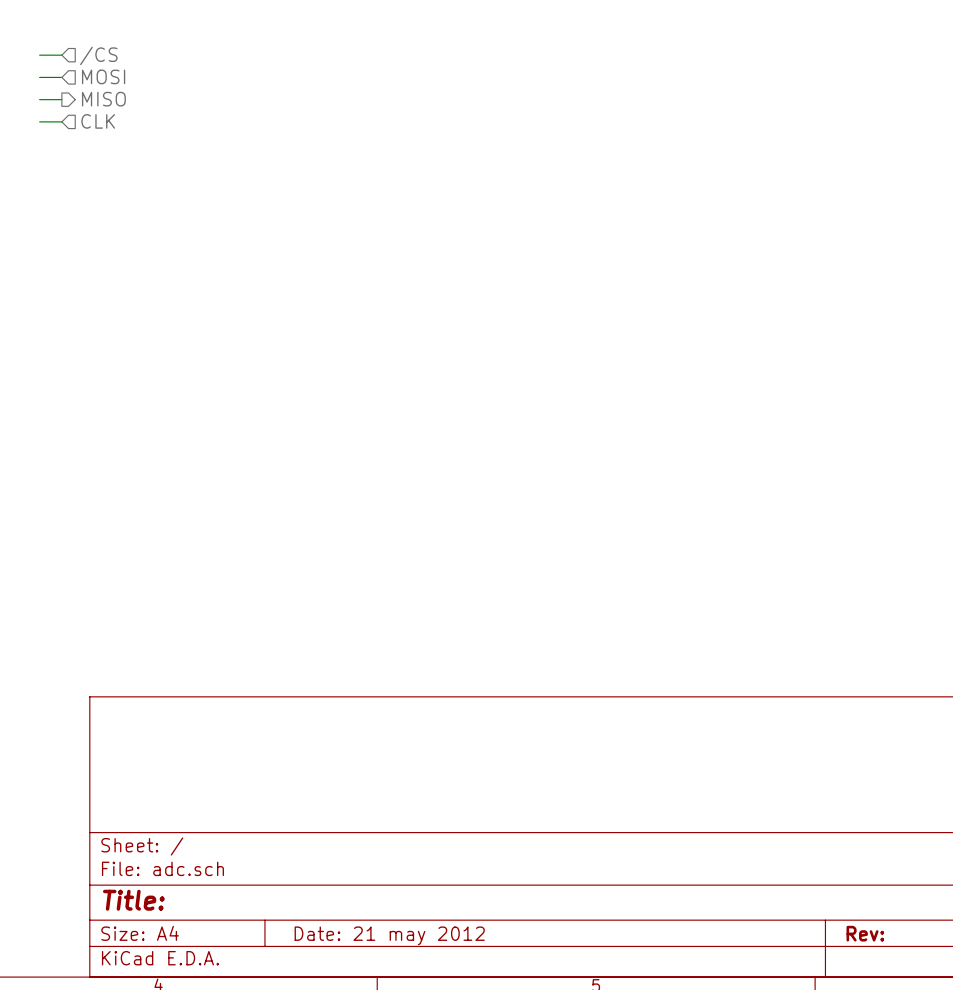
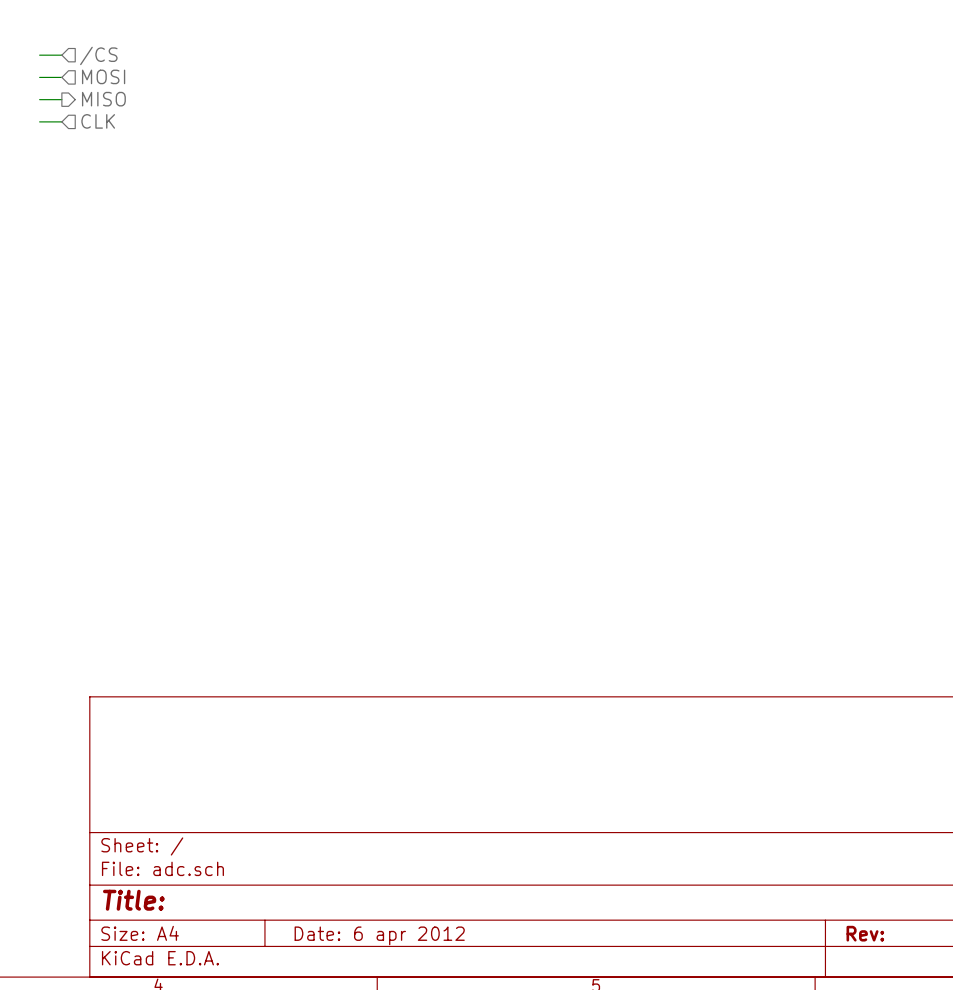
title block: Date: 21 may 2012 (389, 935) -> Date: 6 apr 2012 (379, 935)

